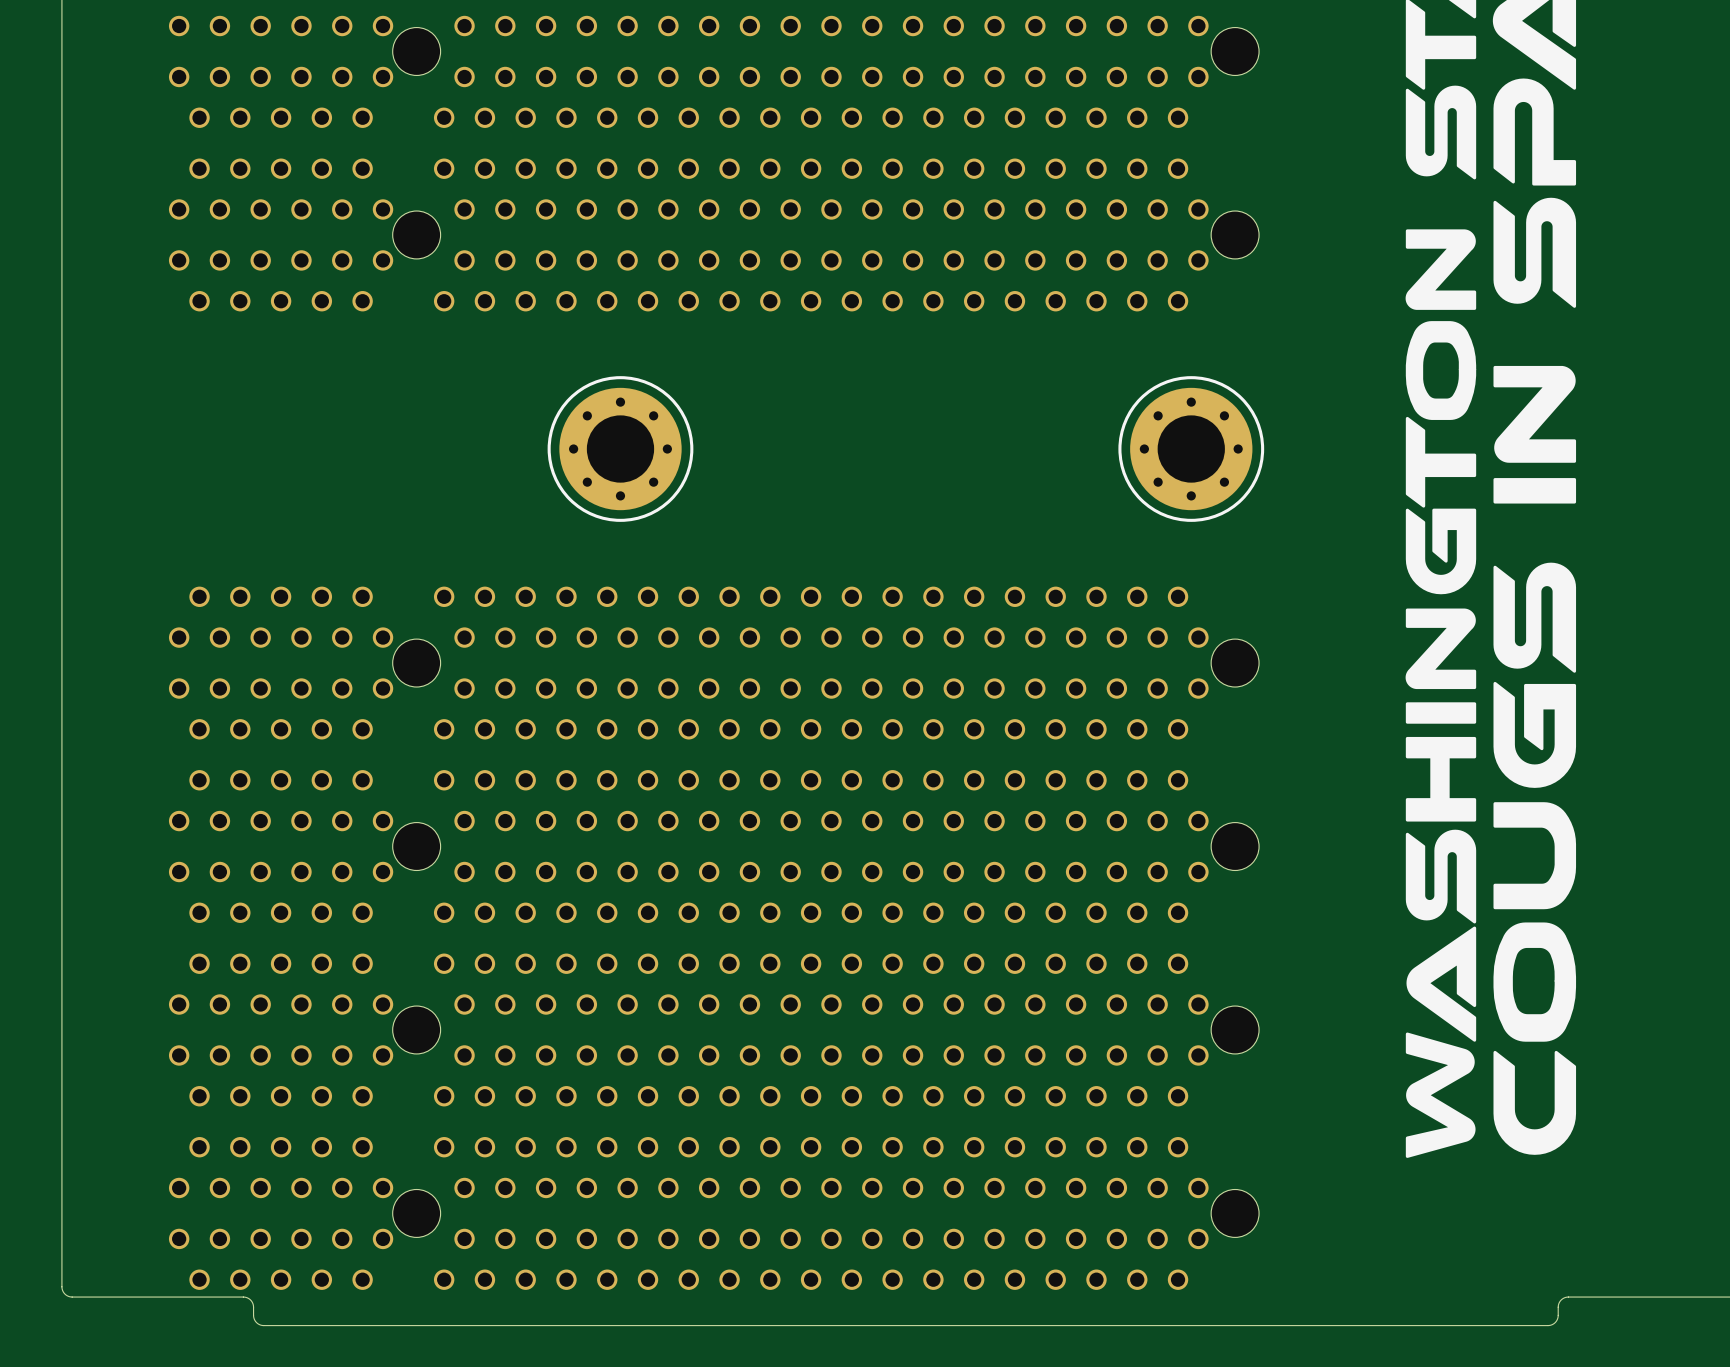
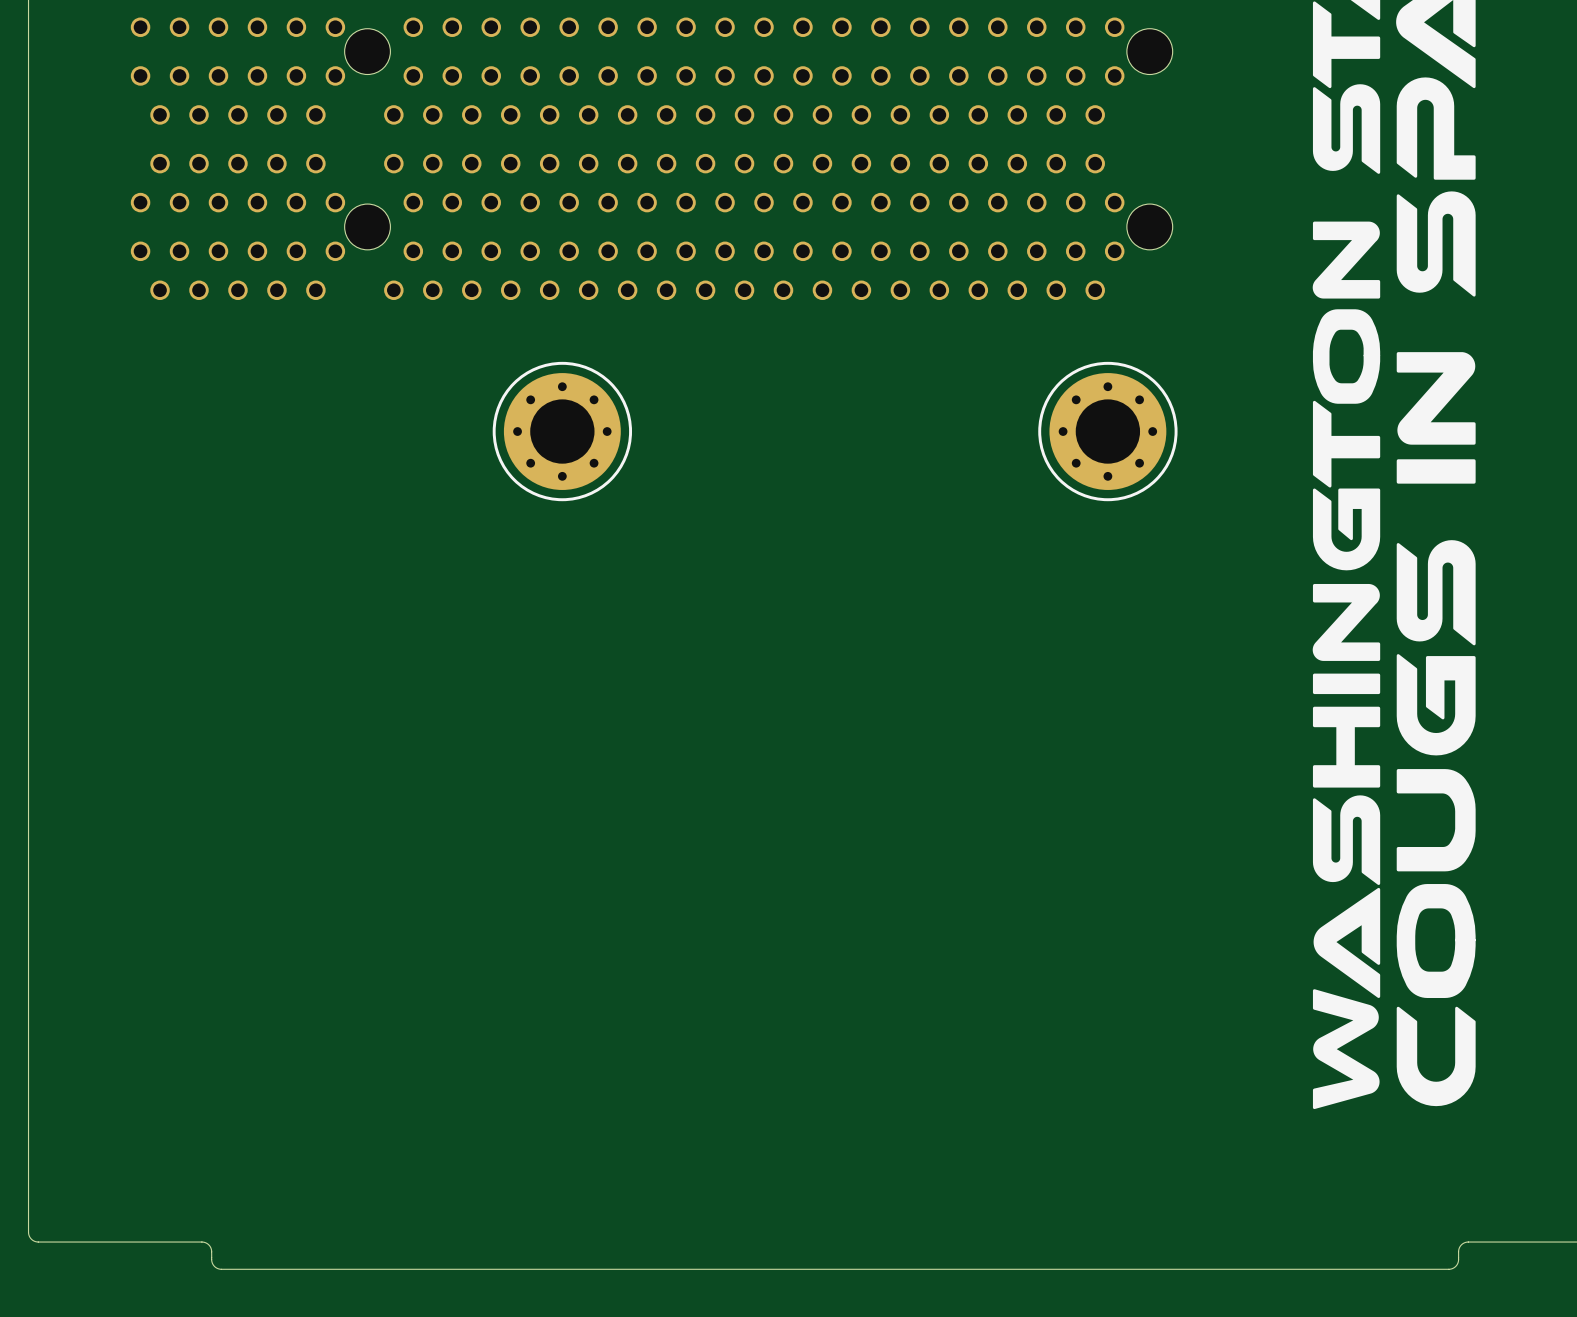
part: (714, 663) -> none
part: (714, 846) -> none
part: (714, 1029) -> none
part: (714, 1213) -> none

